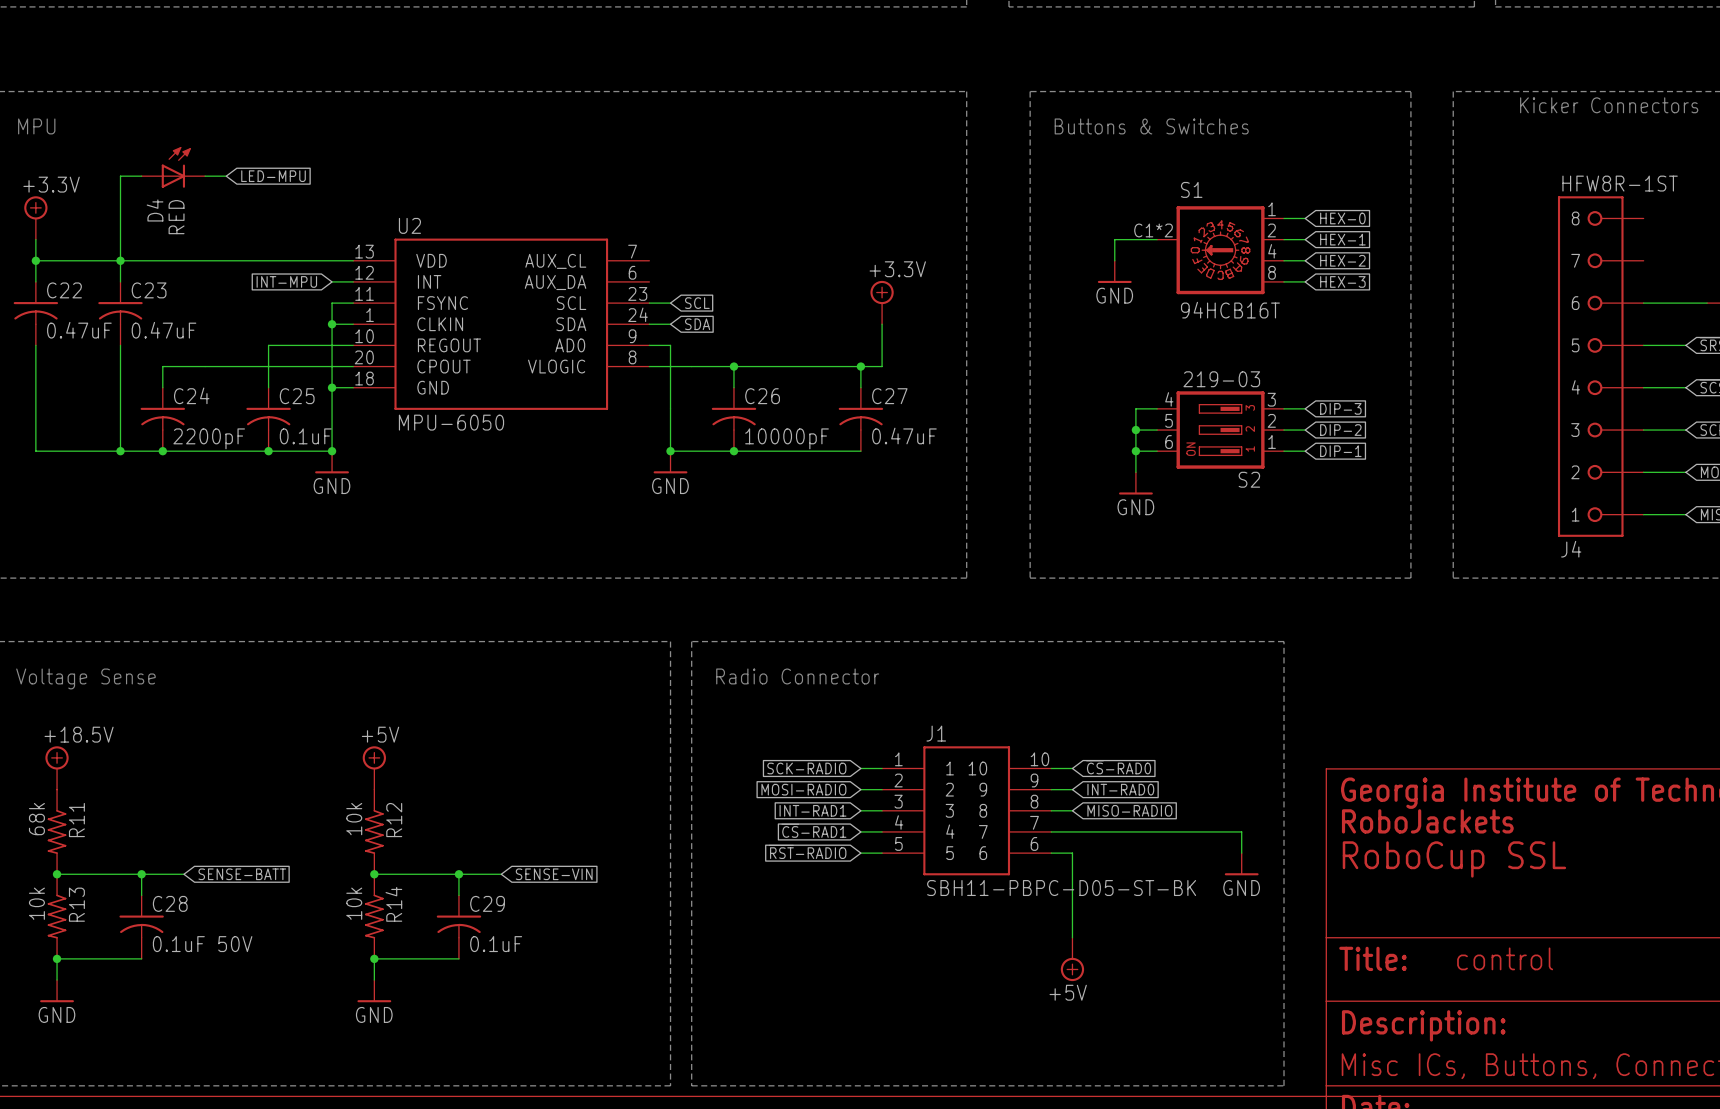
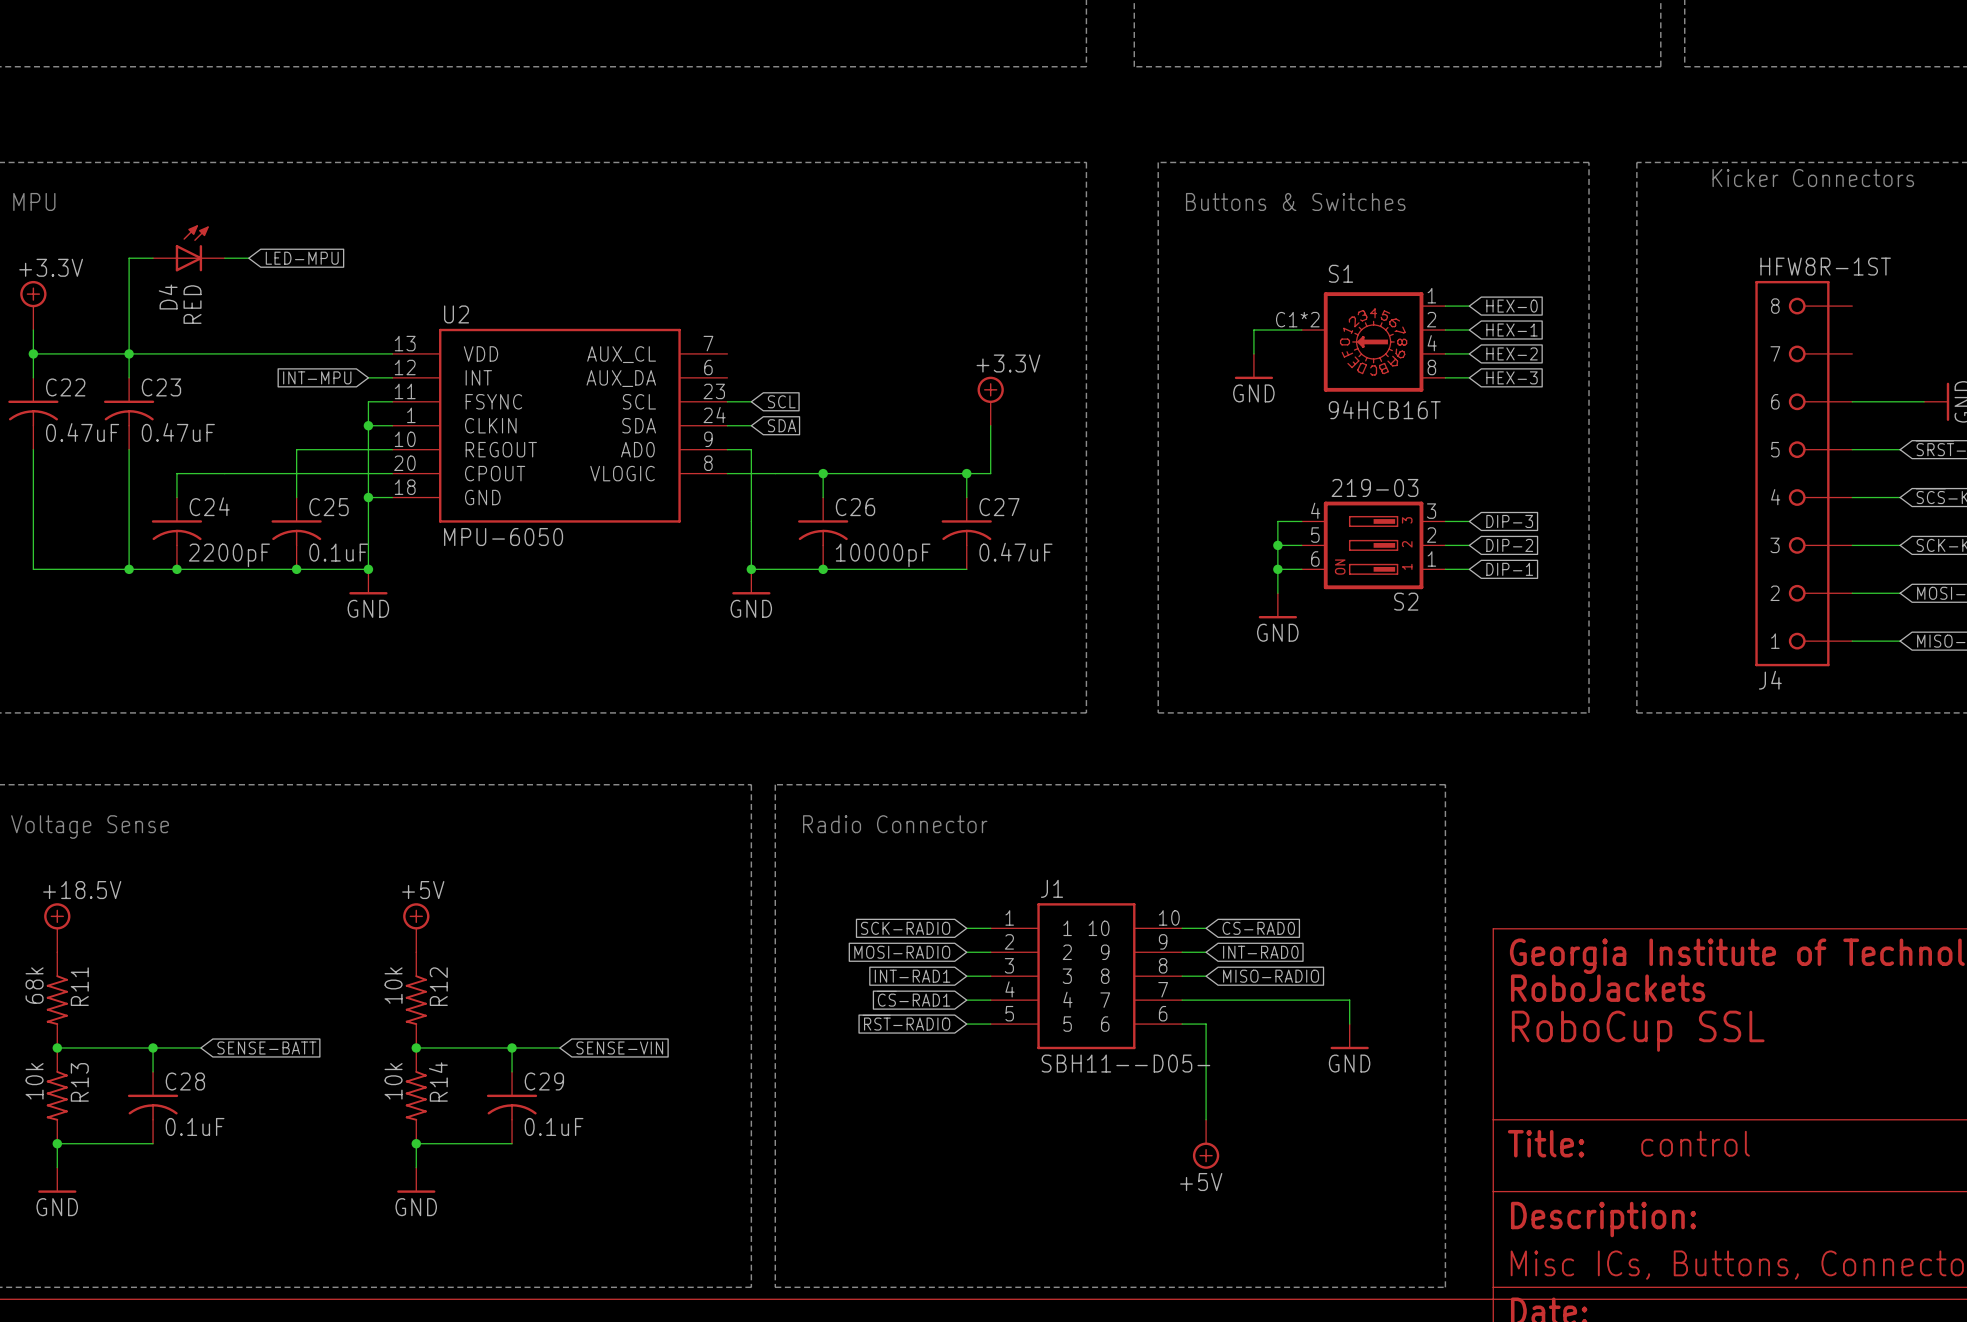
wire: (1199, 831) (1241, 831) (1241, 853) -> (1349, 1000) (1349, 1024)
power symbol position: GND (1241, 864) -> GND (1349, 1036)
J1 value: SBH11-PBPC-D05-ST-BK (1061, 888) -> SBH11--D05- (1125, 1063)
C28 value: 0.1uF 50V (202, 944) -> 0.1uF (195, 1126)

